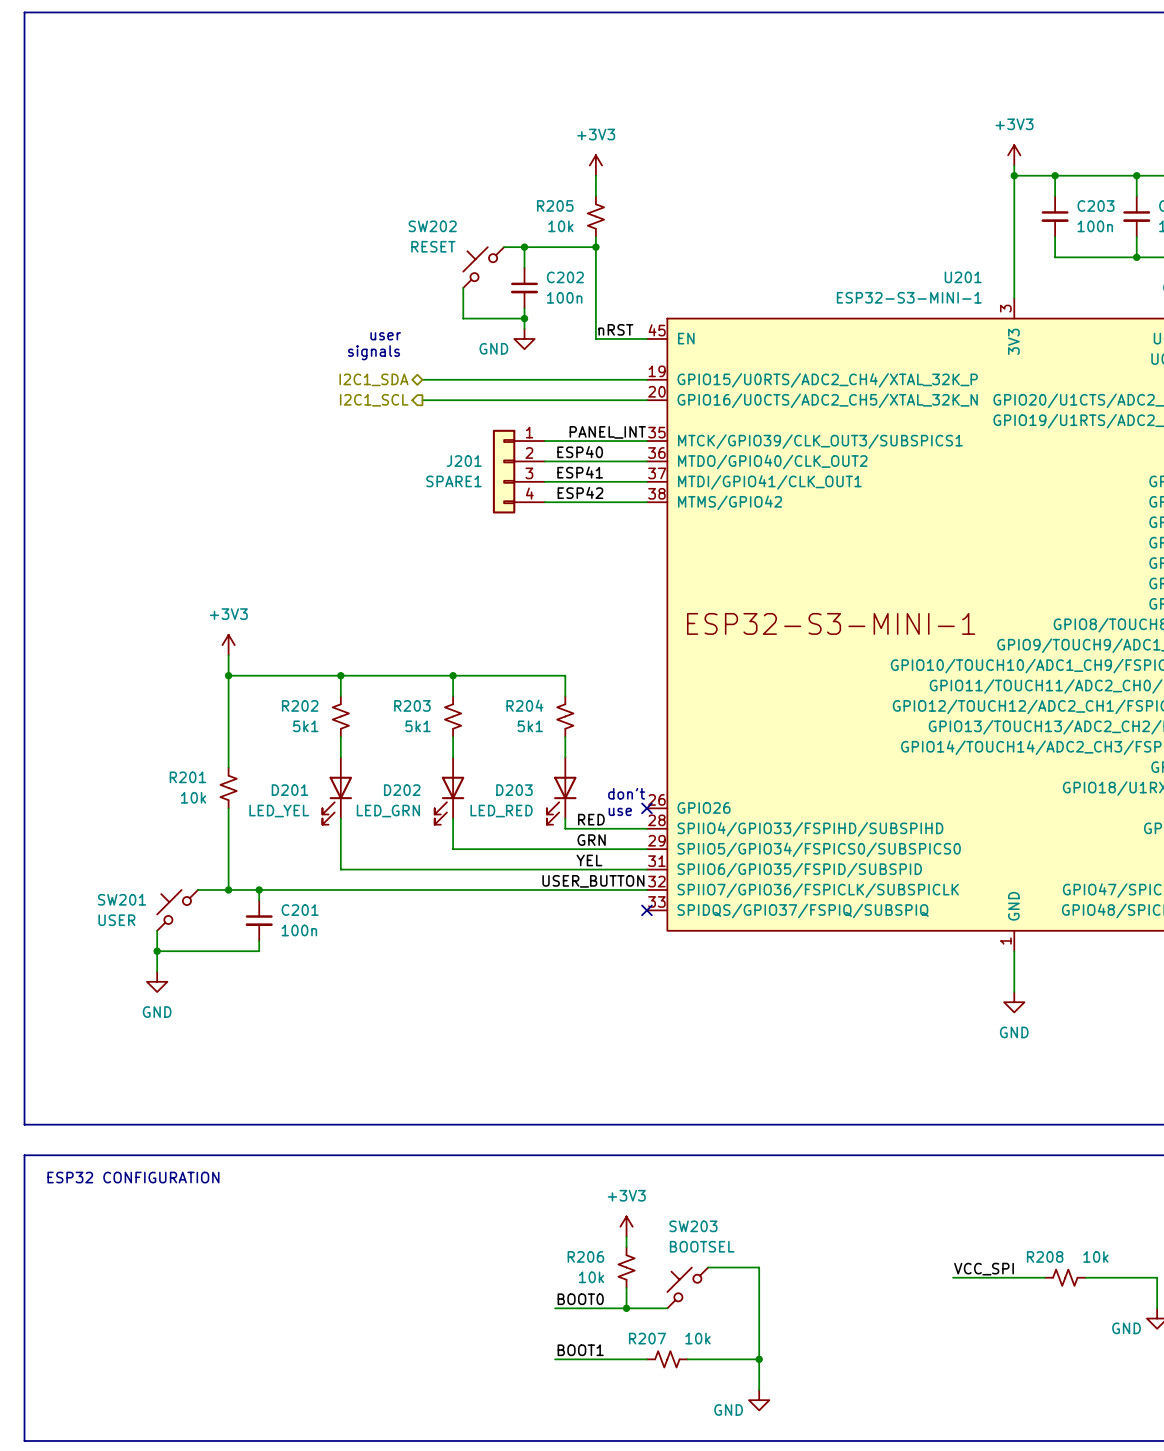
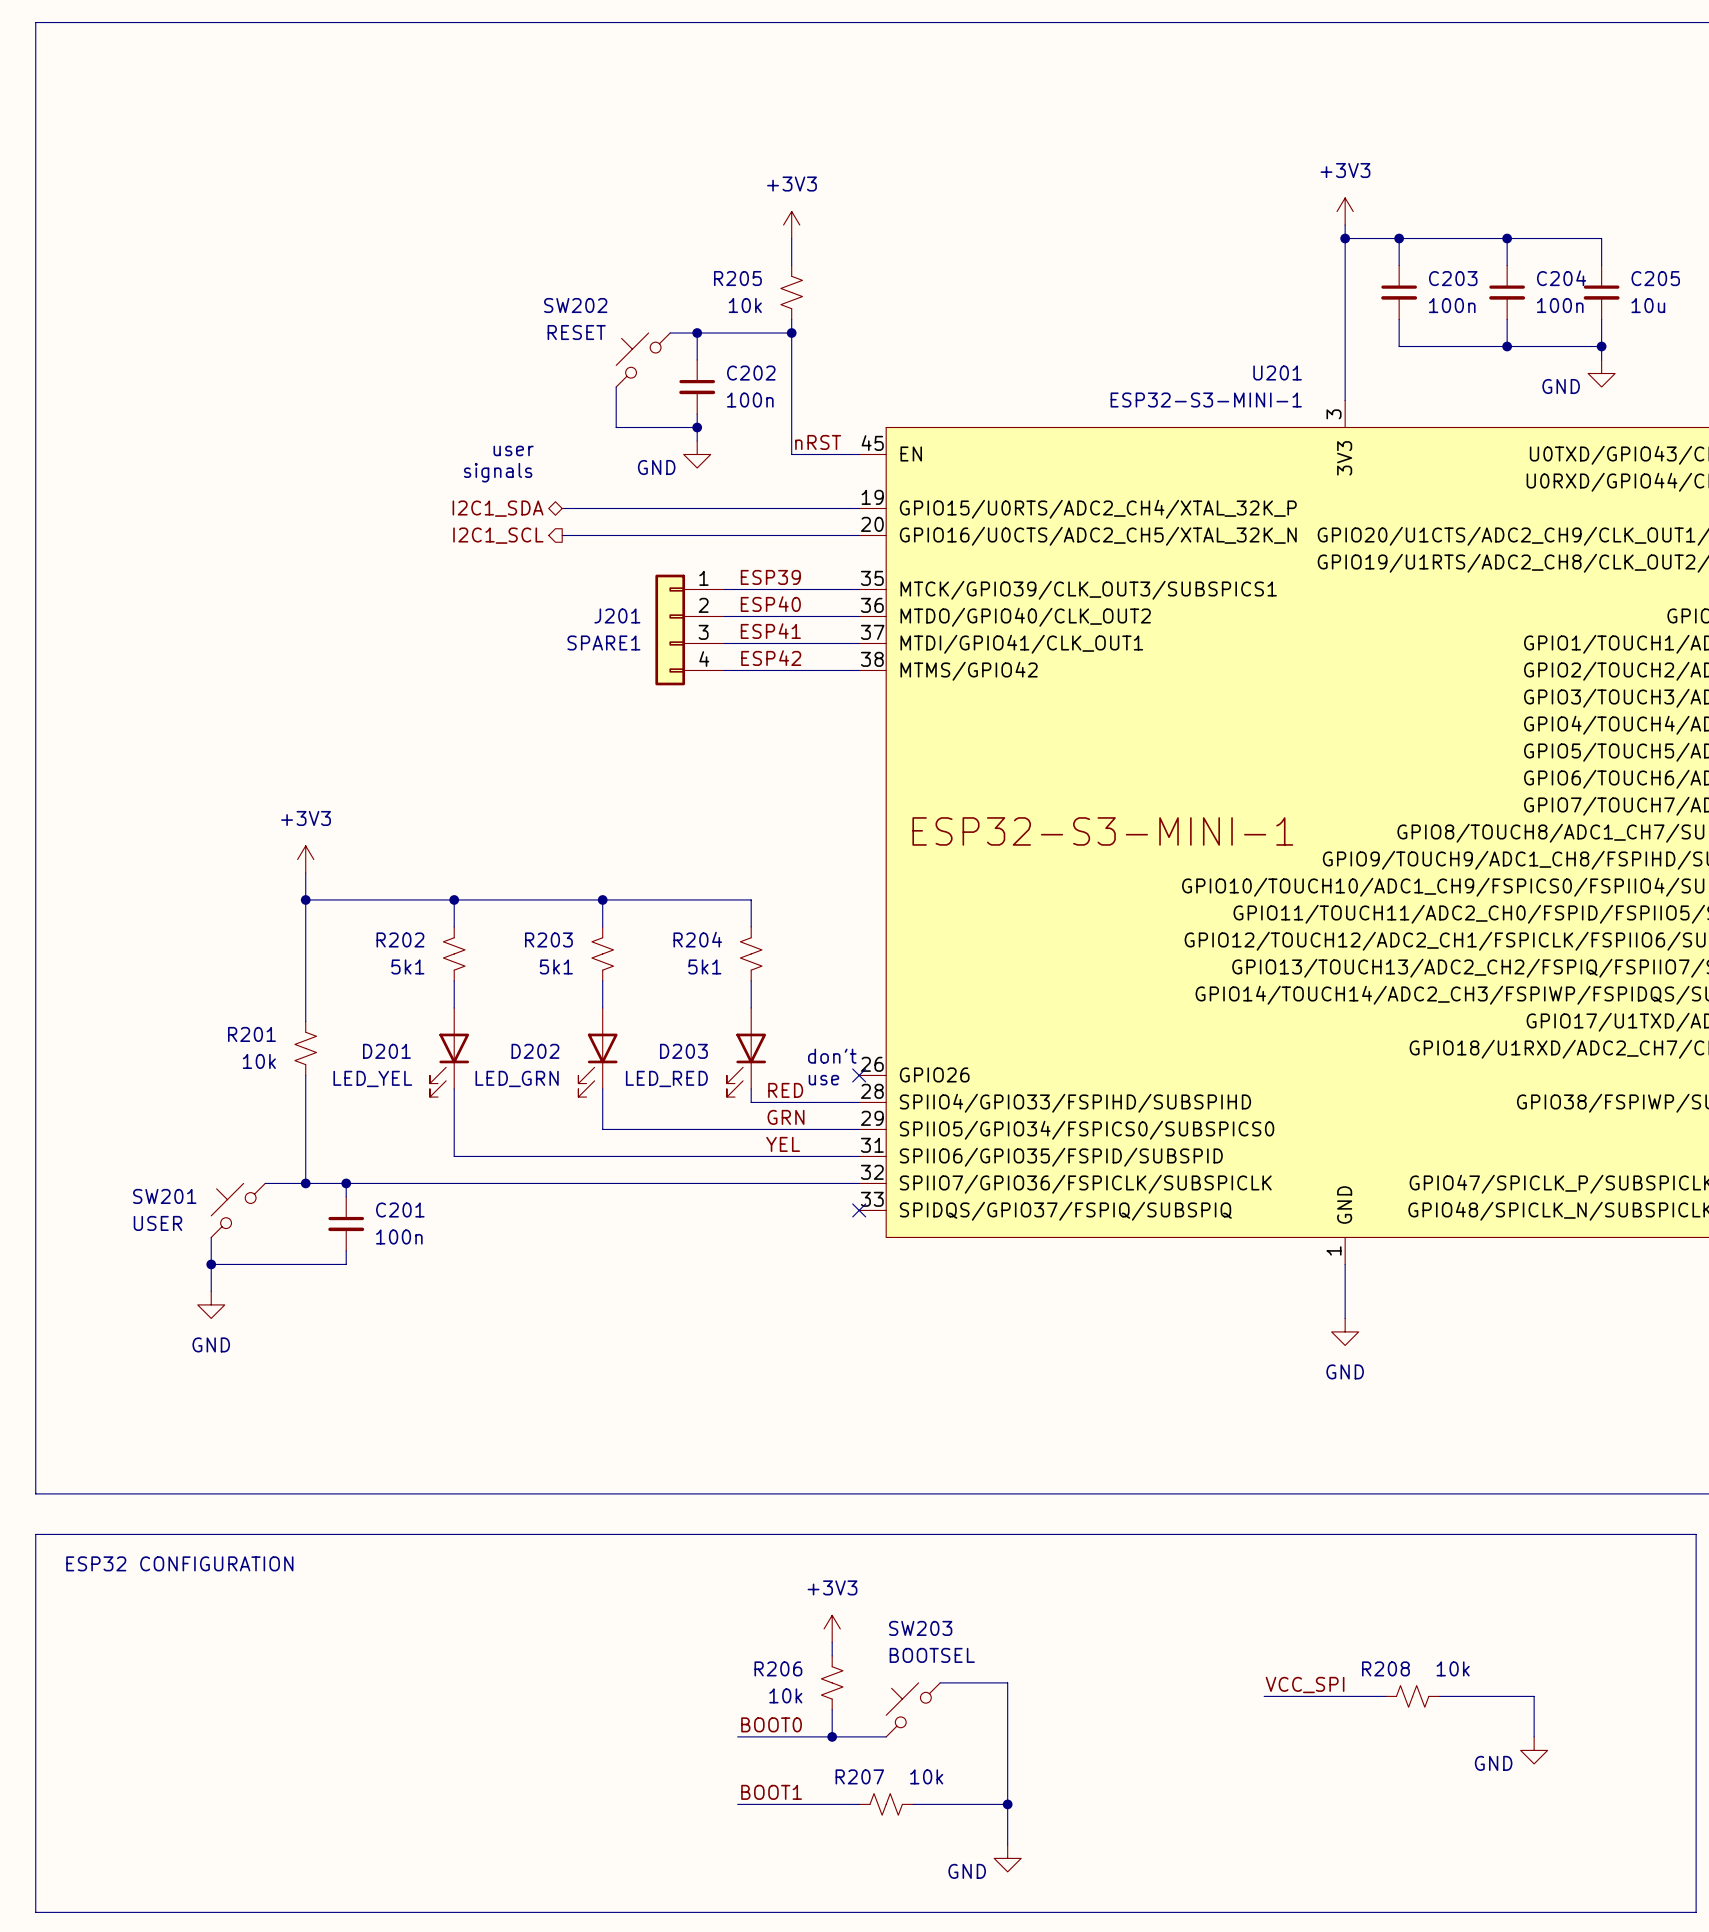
label: none -> ESP39 (770, 577)
label: PANEL_INT (607, 432) -> none
label: USER_BUTTON (593, 881) -> none

